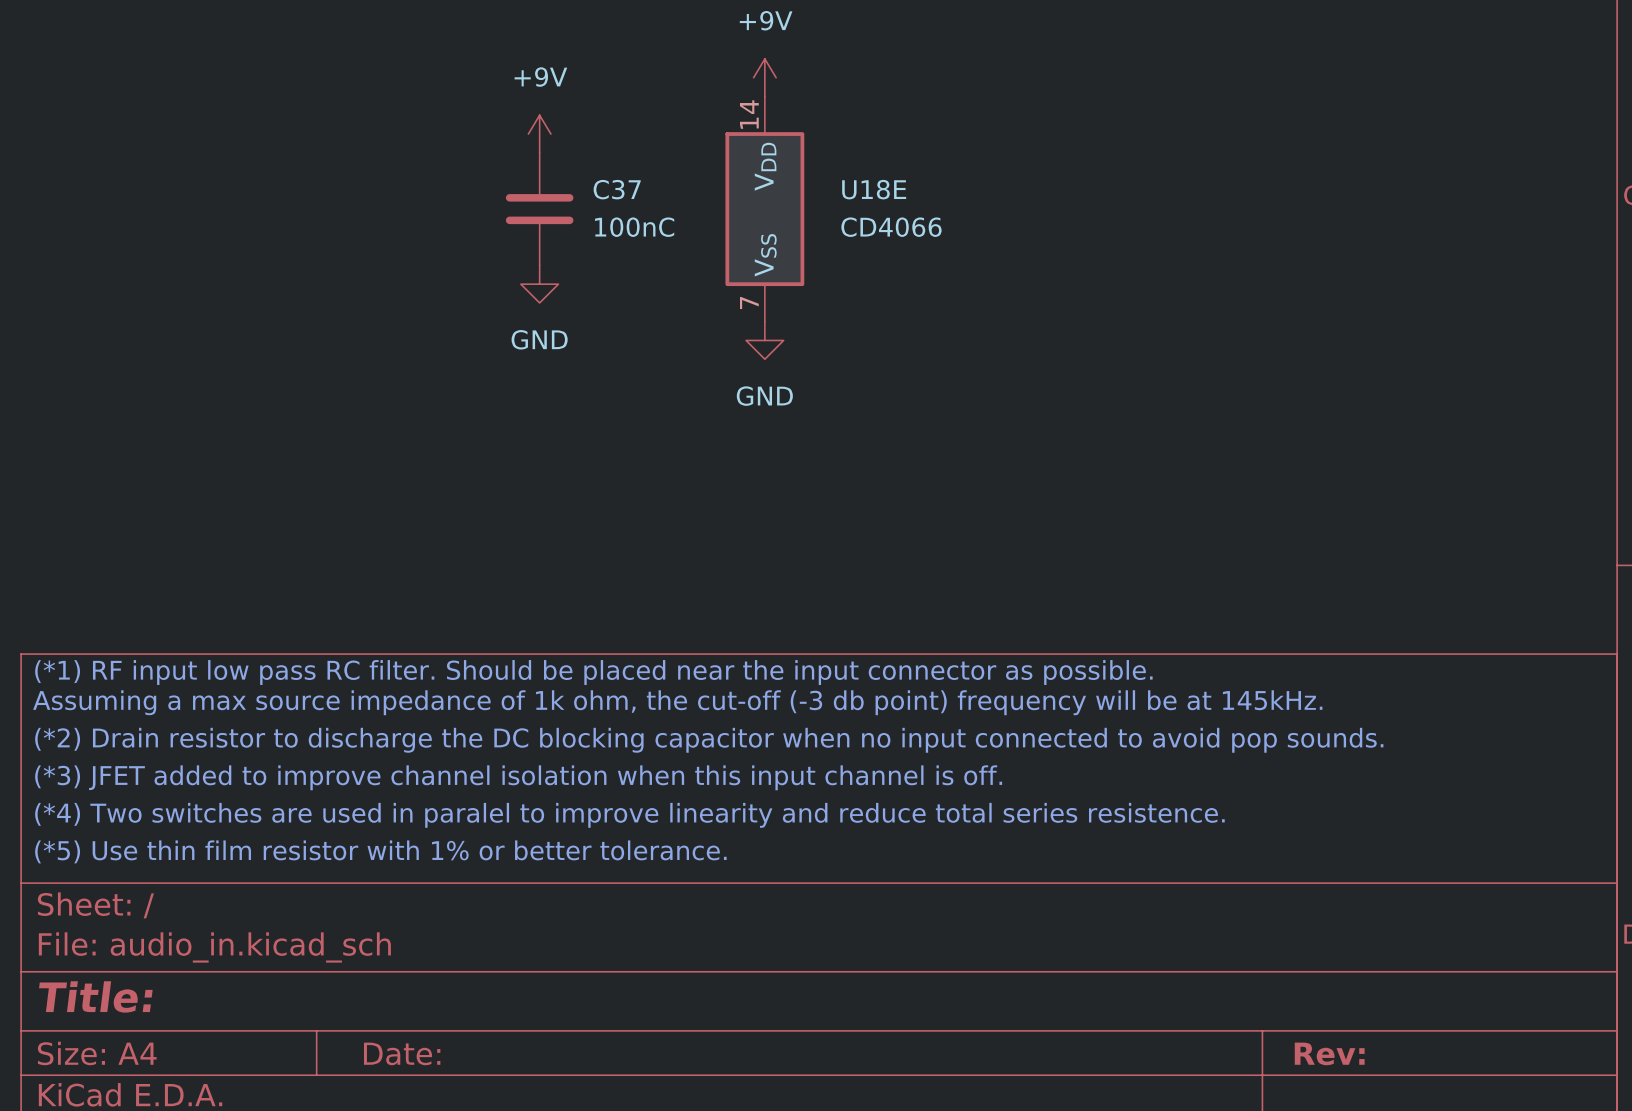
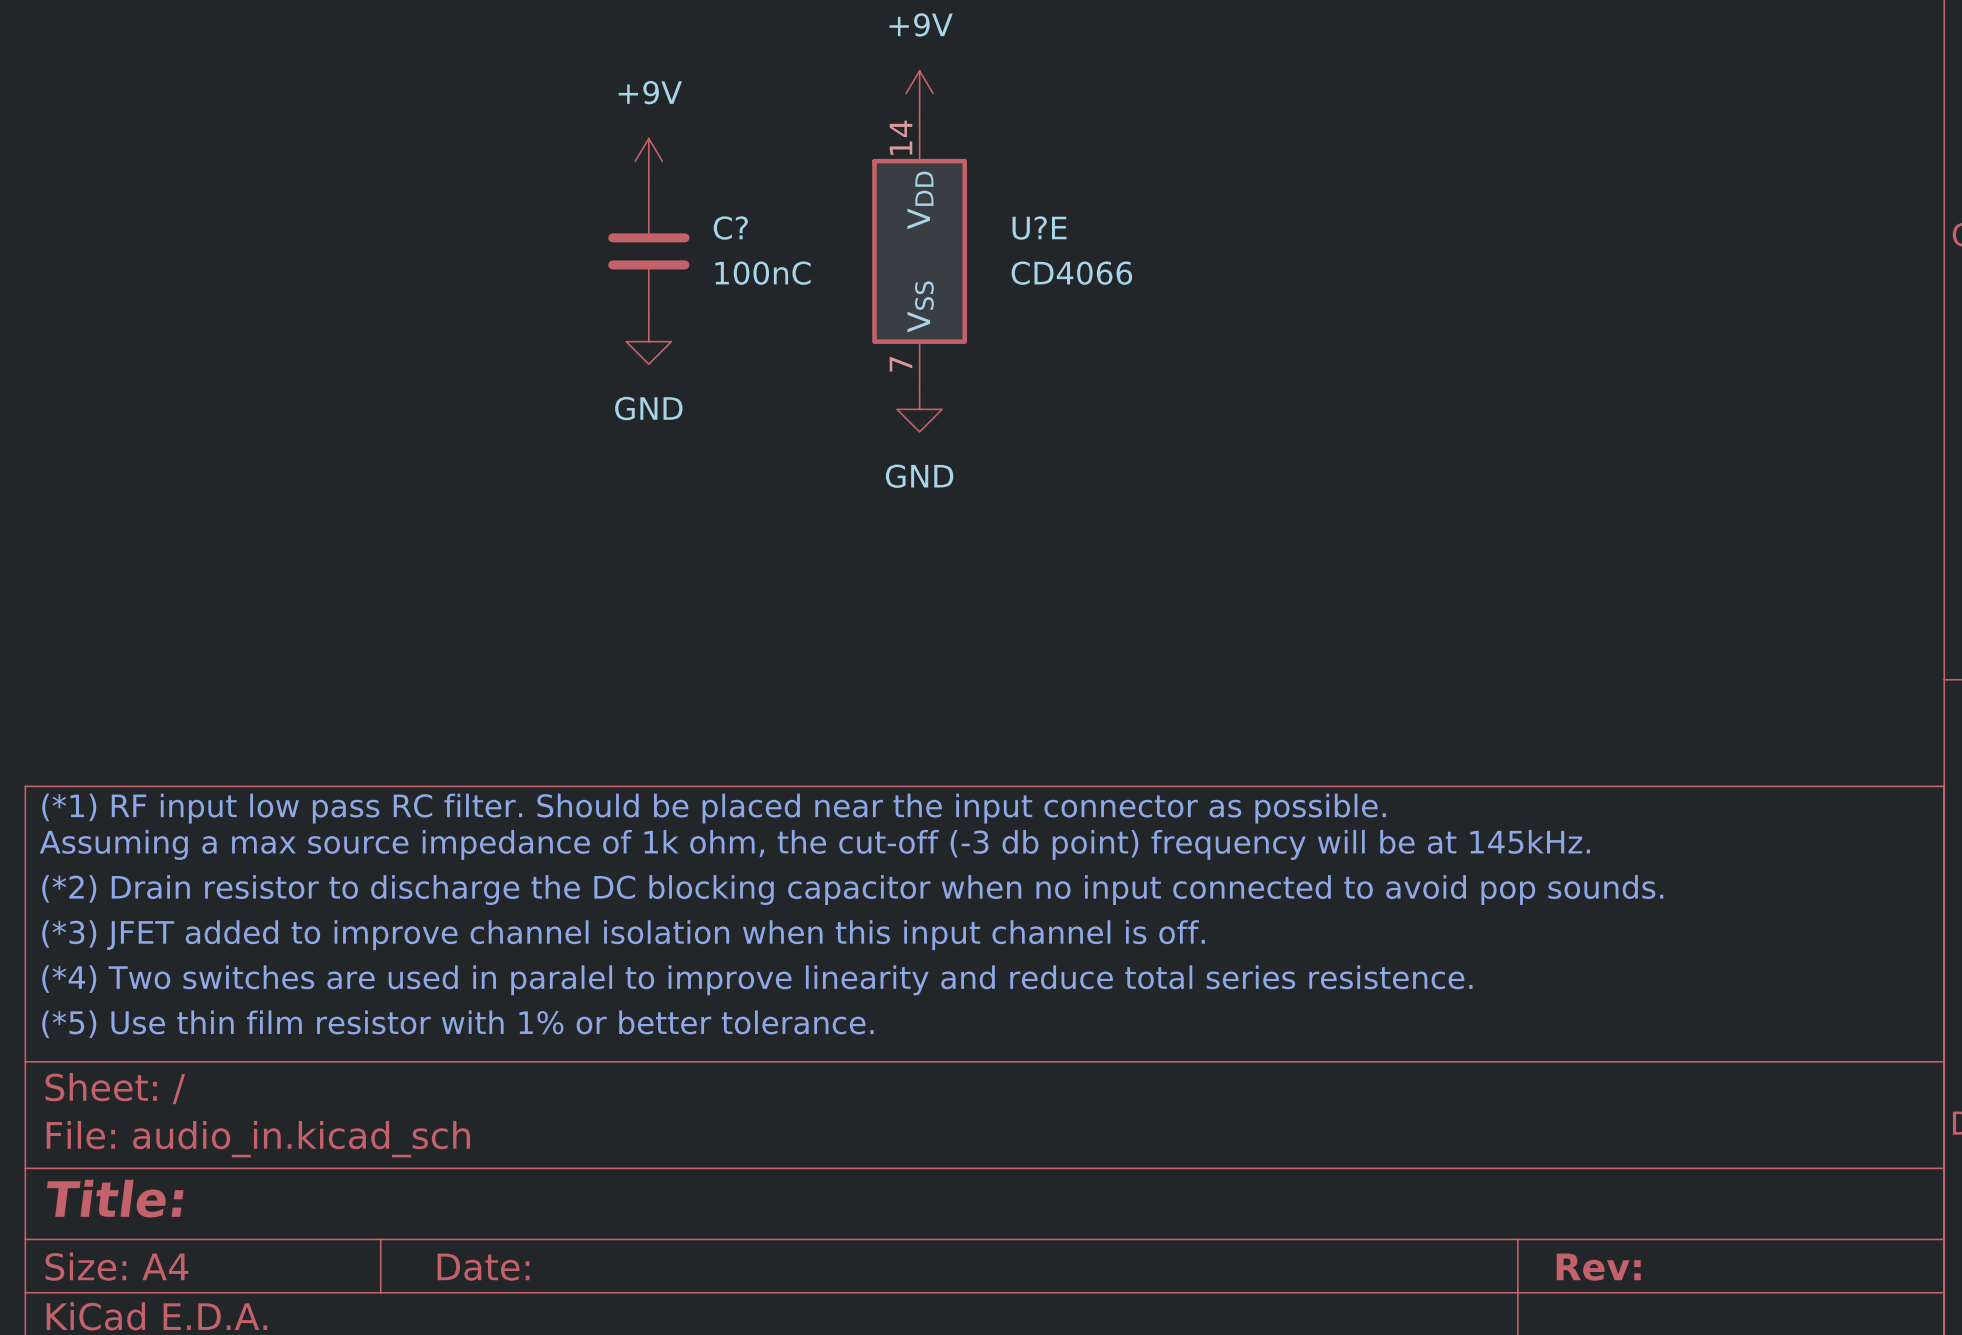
C37 name: C37 (617, 189) -> C? (730, 228)
U18E name: U18E (874, 189) -> U?E (1039, 228)

